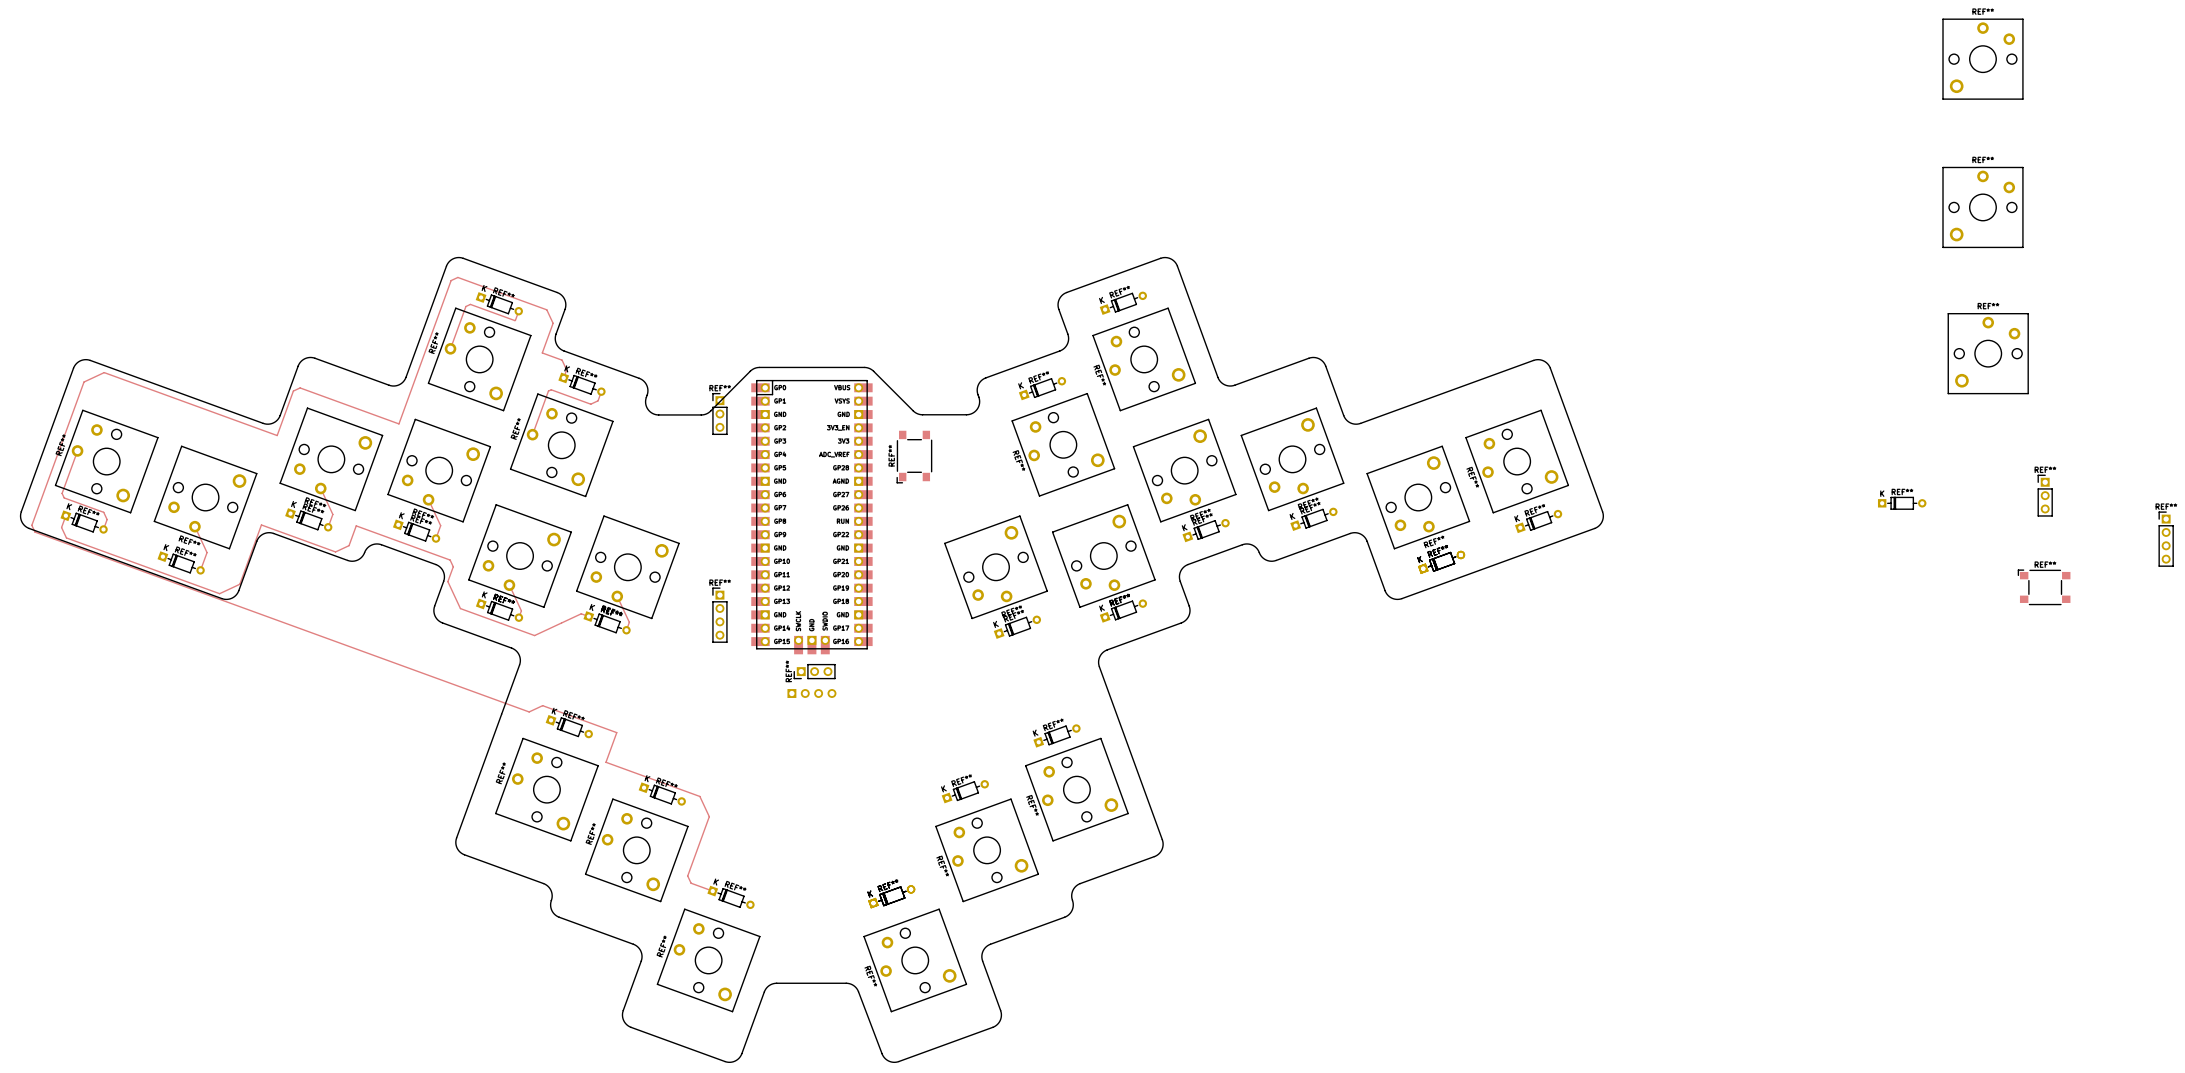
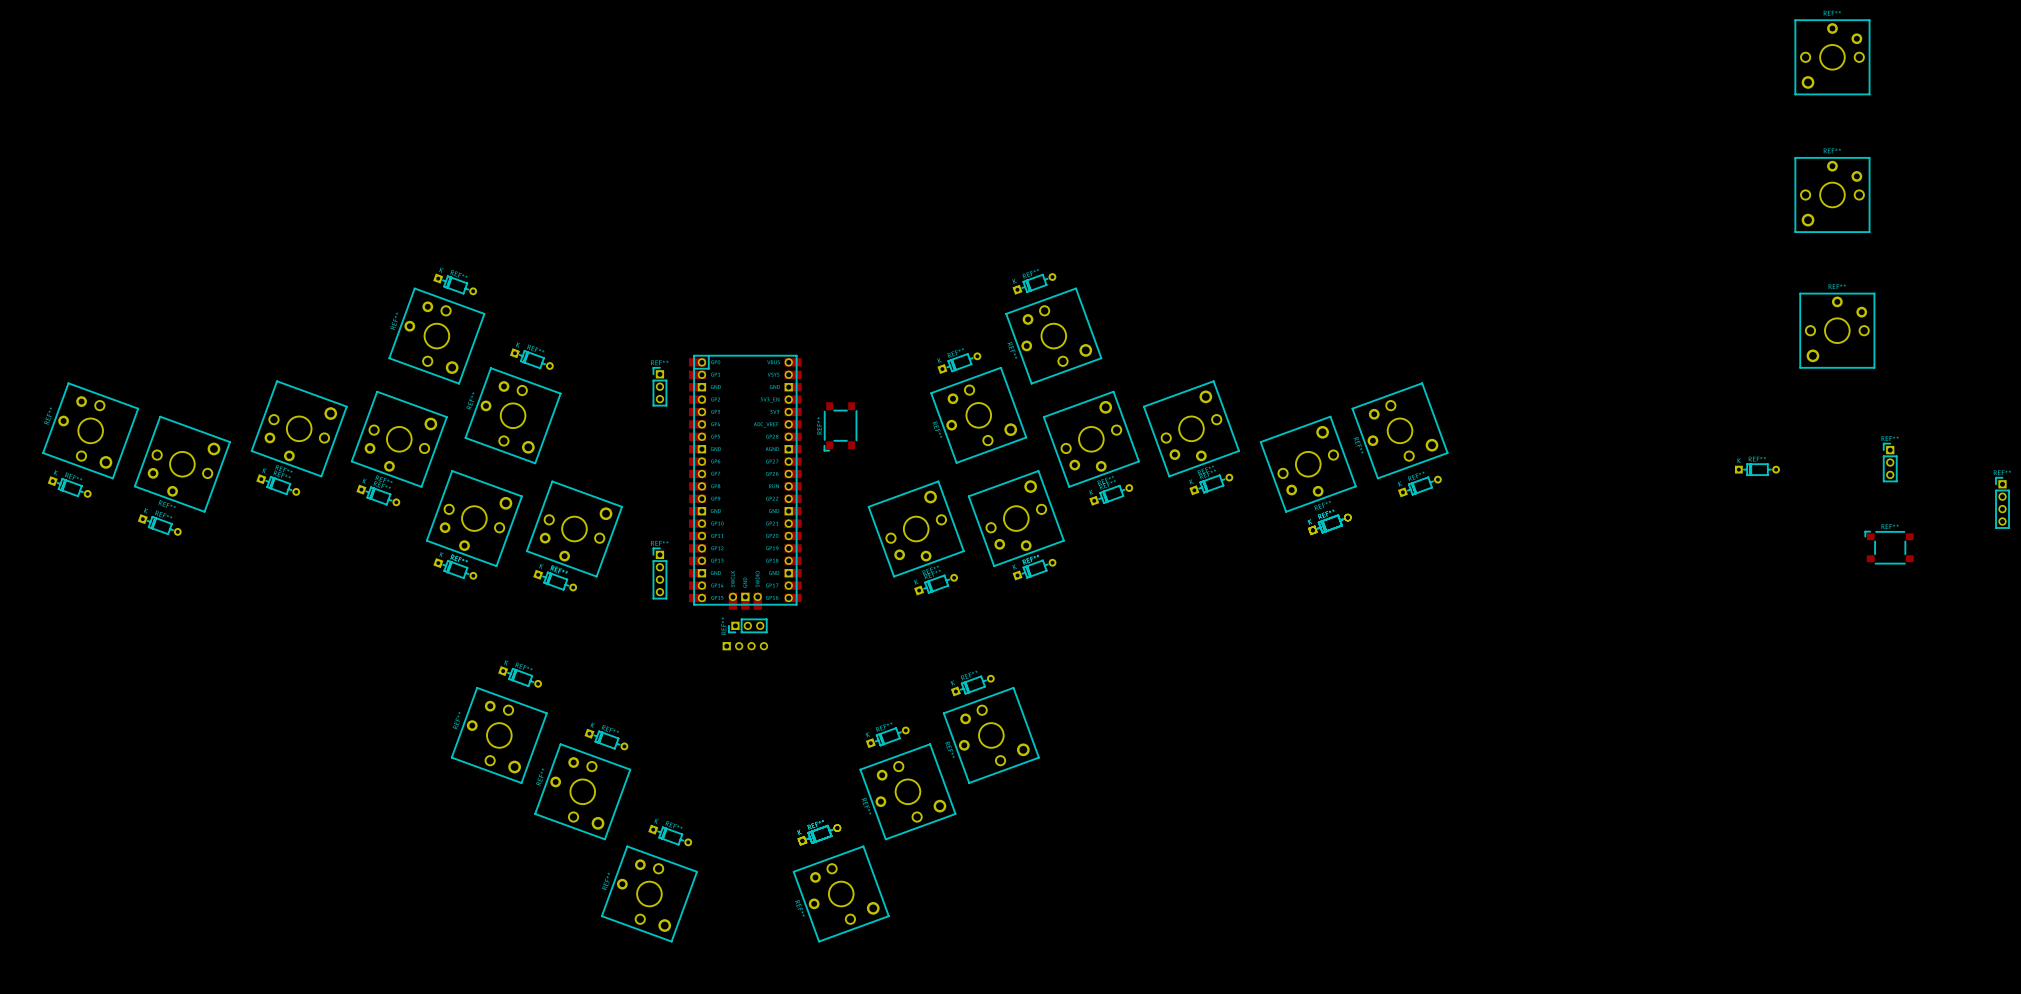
board edge: (463, 258) (561, 295) (565, 306) (555, 335) (558, 346) (563, 350) (641, 379) (647, 387) (646, 406) (654, 414) (706, 413) (750, 371) (756, 367) (864, 367) (872, 370) (917, 413) (966, 414) (973, 412) (978, 407) (979, 401) (977, 387) (983, 379) (1059, 350) (1065, 346) (1068, 335) (1058, 305) (1062, 294) (1160, 258) (1167, 257) (1173, 260) (1177, 266) (1217, 377) (1221, 382) (1233, 385) (1308, 358) (1317, 358) (1325, 364) (1344, 416) (1351, 423) (1360, 423) (1533, 360) (1545, 361) (1550, 368) (1602, 511) (1603, 518) (1600, 524) (1594, 528) (1399, 599) (1391, 598) (1386, 593) (1366, 539) (1362, 535) (1356, 532) (1274, 560) (1264, 559) (1255, 546) (1246, 543) (1185, 566) (1180, 571) (1179, 578) (1189, 608) (1186, 619) (1105, 650) (1100, 655) (1098, 661) (1162, 839) (1162, 846) (1159, 853) (1078, 884) (1072, 891) (1073, 907) (1067, 915) (990, 944) (984, 948) (982, 959) (1001, 1013) (1000, 1020) (994, 1026) (898, 1061) (891, 1062) (882, 1055) (858, 991) (853, 985) (846, 983) (775, 983) (769, 985) (764, 990) (740, 1056) (733, 1061) (726, 1062) (631, 1027) (625, 1023) (622, 1012) (641, 958) (641, 952) (637, 946) (557, 916) (551, 909) (551, 893) (546, 885) (464, 854) (457, 849) (456, 837) (520, 659) (517, 652) (513, 648) (442, 622) (436, 619) (434, 607) (444, 577) (439, 566) (378, 544) (368, 547) (359, 559) (349, 560) (267, 532) (261, 535) (257, 539) (237, 593) (231, 598) (224, 599) (29, 528) (21, 520) (21, 511) (73, 368) (79, 361) (90, 360) (263, 423) (271, 423) (279, 417) (298, 364) (306, 358) (315, 358) (390, 385) (402, 382) (405, 377) (447, 264) (454, 258) (463, 258) -> none
track: (518, 311) (514, 320) (470, 304) (465, 306) (450, 348) -> none
track: (563, 377) (566, 369) (562, 360) (542, 352) (553, 323) (546, 309) (457, 277) (451, 280) (398, 423) (300, 387) (293, 391) (277, 435) (104, 372) (84, 382) (31, 525) (34, 532) (529, 711) (542, 705) (616, 732) (605, 762) (699, 796) (709, 816) (687, 875) (691, 883) (712, 891) -> none
track: (601, 391) (598, 400) (590, 404) (551, 389) (548, 391) (532, 434) -> none
track: (77, 450) (62, 493) (64, 497) (103, 512) (107, 519) (103, 529) -> none
track: (320, 488) (332, 514) (328, 527) -> none
track: (428, 499) (440, 525) (436, 538) -> none
track: (65, 515) (61, 527) (66, 537) (219, 593) (239, 584) (261, 524) (335, 551) (349, 545) (356, 525) (450, 560) (453, 566) (447, 581) (460, 608) (534, 635) (581, 613) (588, 616) -> none
track: (194, 526) (207, 552) (200, 570) -> none
track: (509, 585) (521, 610) (518, 617) -> none
track: (617, 596) (629, 622) (626, 630) -> none

